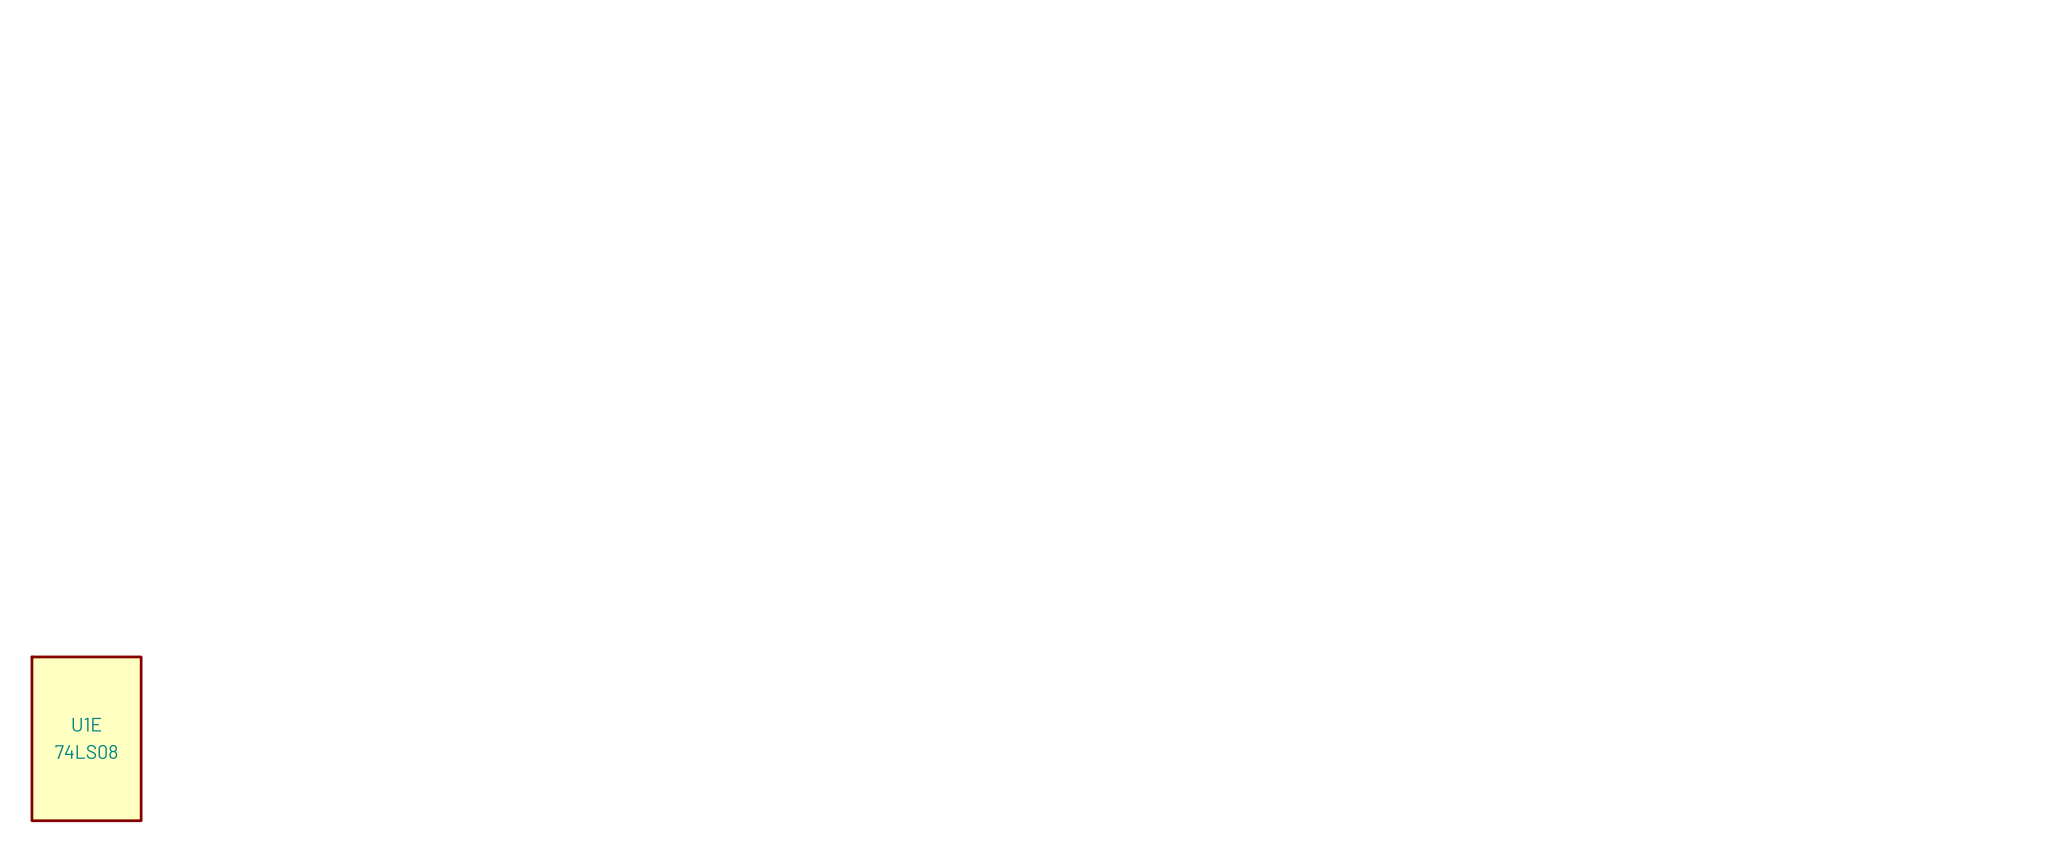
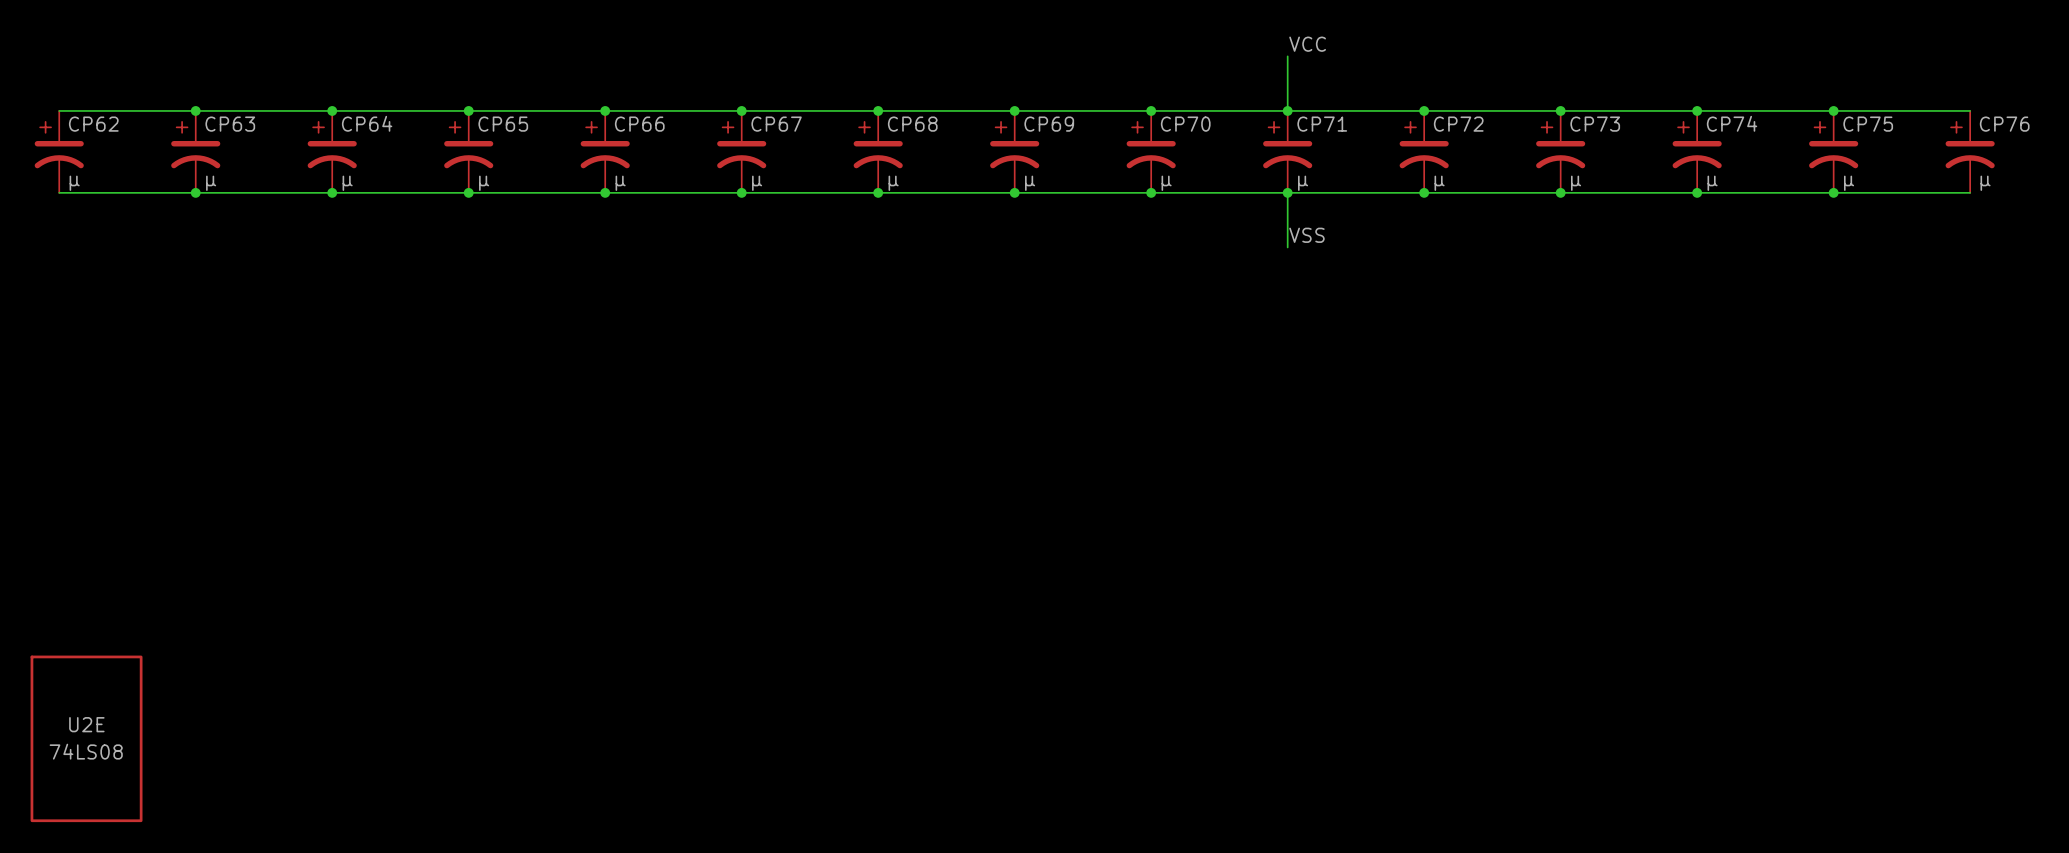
label: none -> VCC (1307, 44)
wire: none -> (1287, 56) (1287, 110)
wire: none -> (59, 110) (1970, 110)
junction: none -> (195, 110)
junction: none -> (332, 110)
junction: none -> (468, 110)
junction: none -> (605, 110)
junction: none -> (741, 110)
junction: none -> (878, 110)
junction: none -> (1014, 110)
junction: none -> (1151, 110)
junction: none -> (1287, 110)
junction: none -> (1424, 110)
junction: none -> (1560, 110)
junction: none -> (1697, 110)
junction: none -> (1833, 110)
CP62: none -> μ (59, 151)
CP63: none -> μ (195, 151)
CP64: none -> μ (332, 151)
CP65: none -> μ (468, 151)
CP66: none -> μ (605, 151)
CP67: none -> μ (741, 151)
CP68: none -> μ (878, 151)
CP69: none -> μ (1014, 151)
CP70: none -> μ (1151, 151)
CP71: none -> μ (1287, 151)
CP72: none -> μ (1424, 151)
CP73: none -> μ (1560, 151)
CP74: none -> μ (1697, 151)
CP75: none -> μ (1833, 151)
CP76: none -> μ (1970, 151)
wire: none -> (59, 192) (1970, 192)
junction: none -> (195, 192)
junction: none -> (332, 192)
junction: none -> (468, 192)
junction: none -> (605, 192)
junction: none -> (741, 192)
junction: none -> (878, 192)
junction: none -> (1014, 192)
junction: none -> (1151, 192)
wire: none -> (1287, 192) (1287, 247)
junction: none -> (1287, 192)
junction: none -> (1424, 192)
junction: none -> (1560, 192)
junction: none -> (1697, 192)
junction: none -> (1833, 192)
label: none -> VSS (1306, 235)
U1E name: U1E (86, 724) -> U2E (86, 724)

